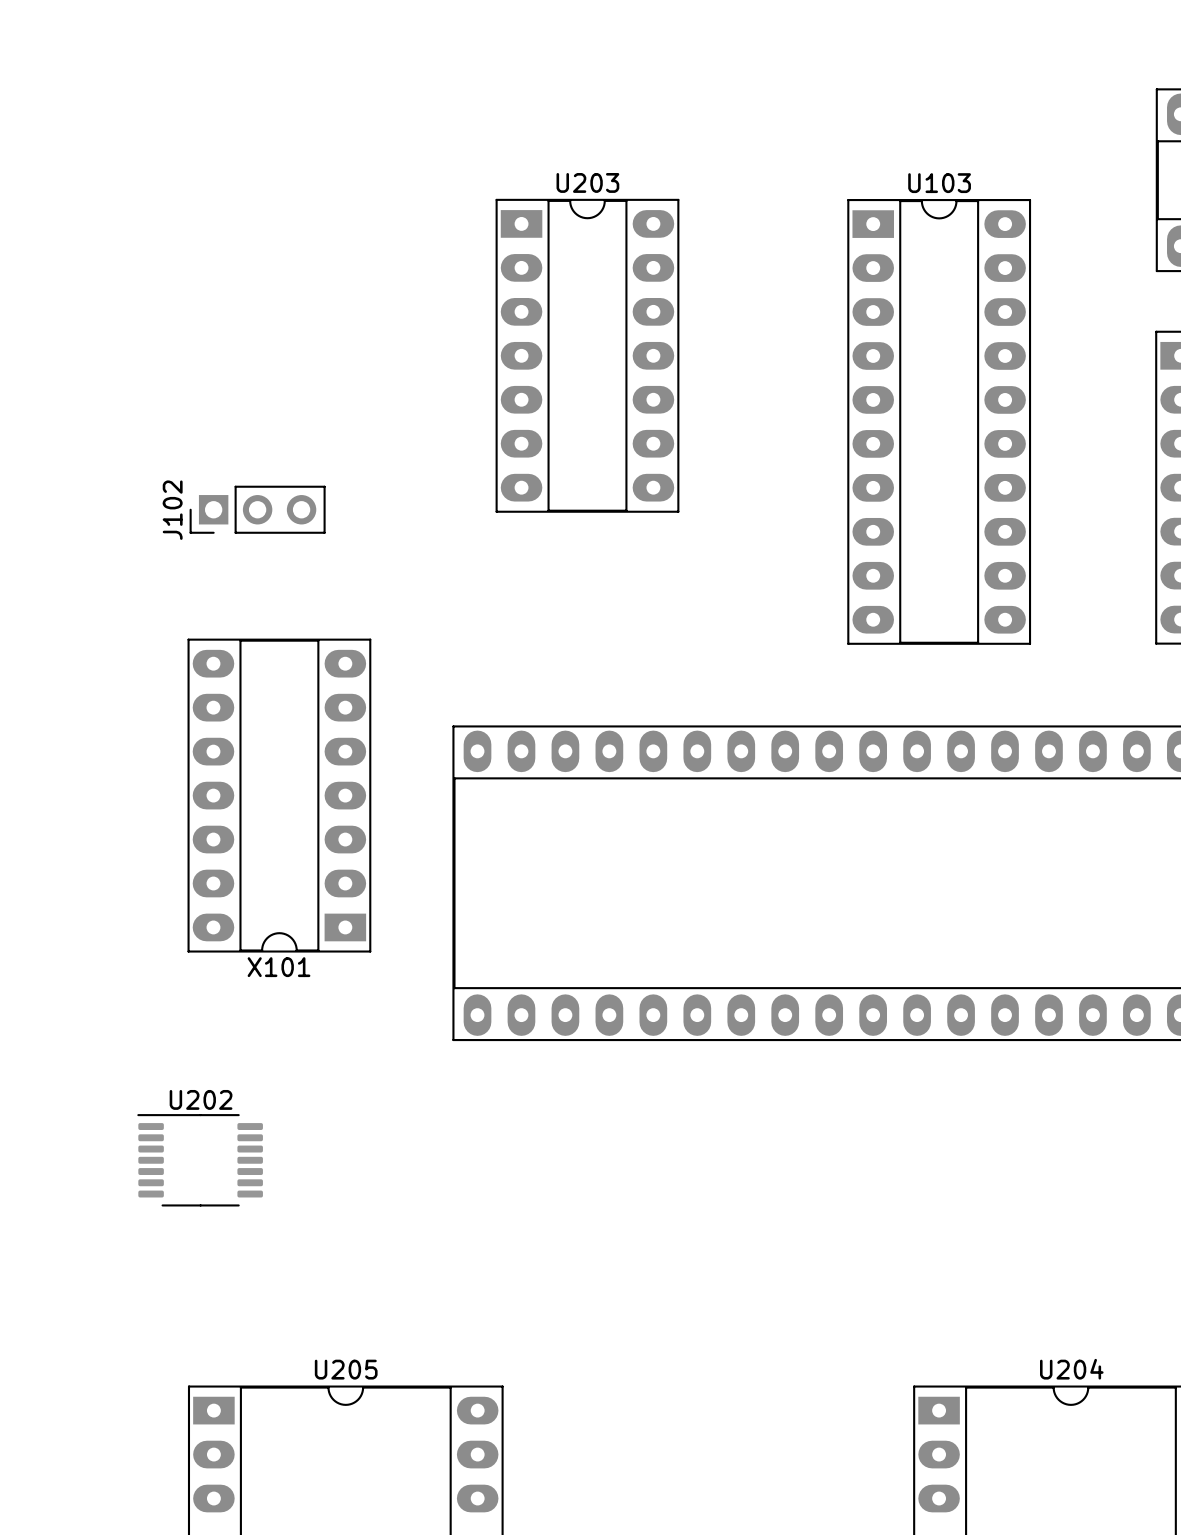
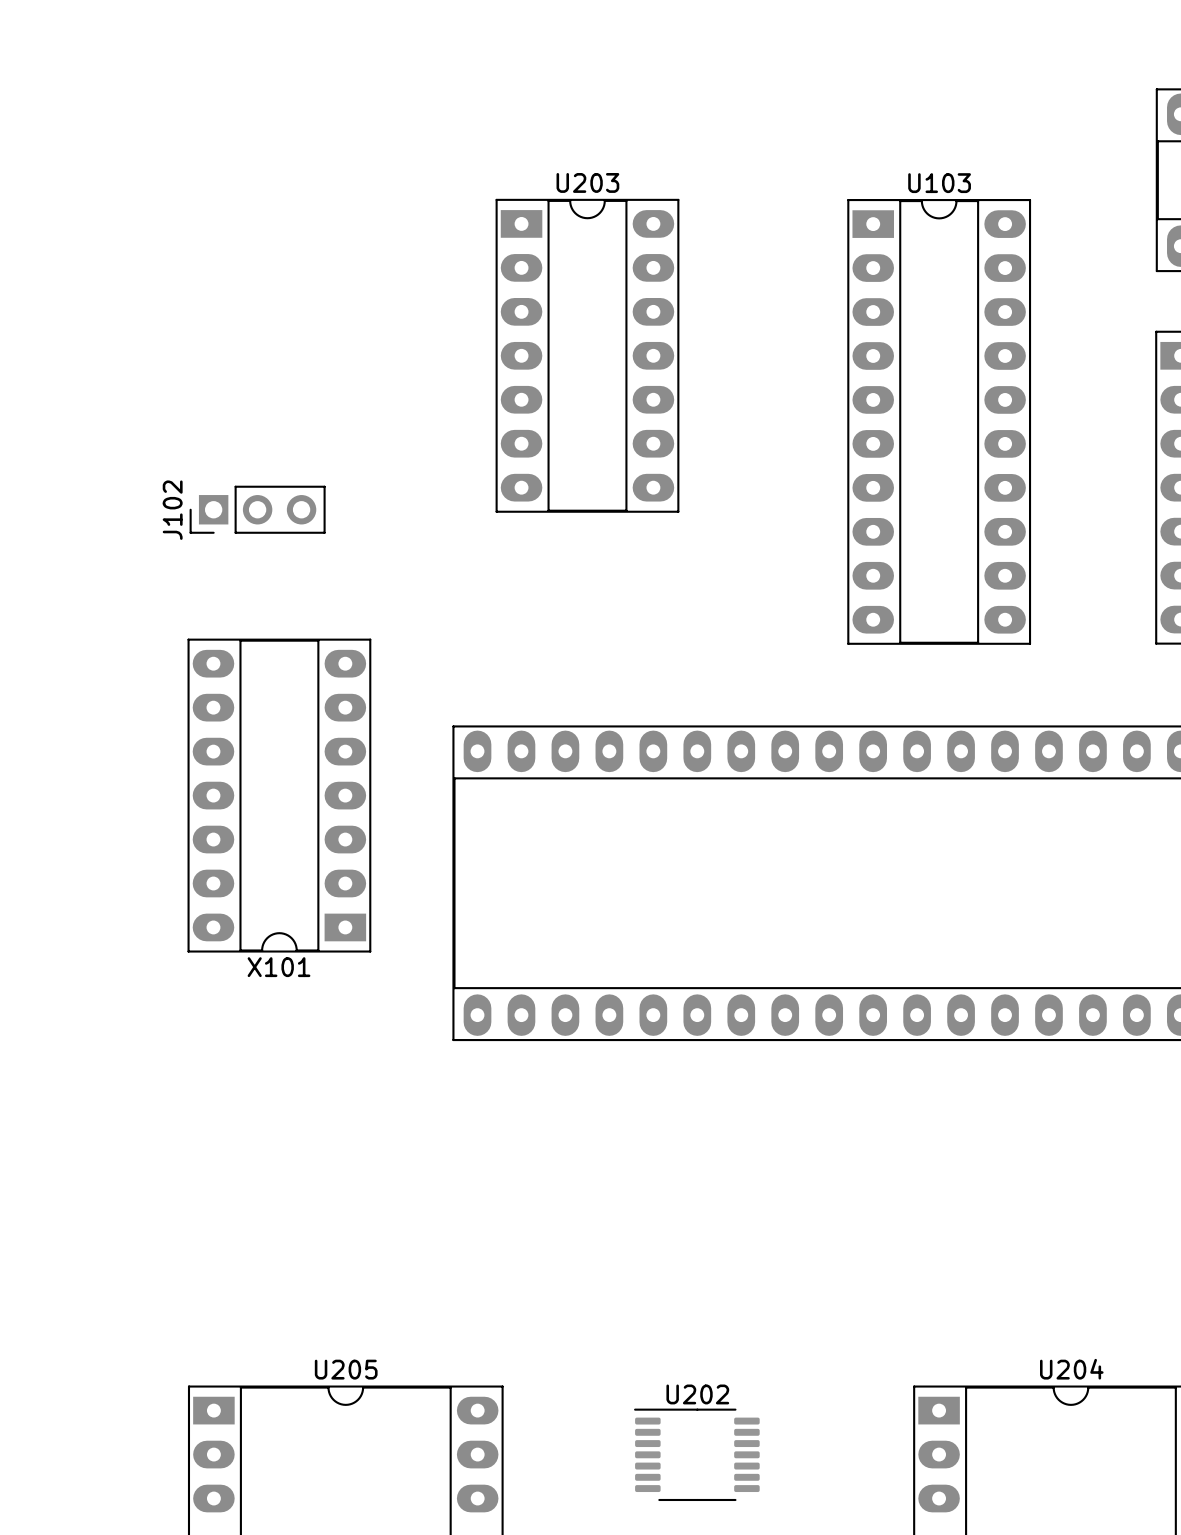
U202 position: (200, 1160) -> (696, 1454)

